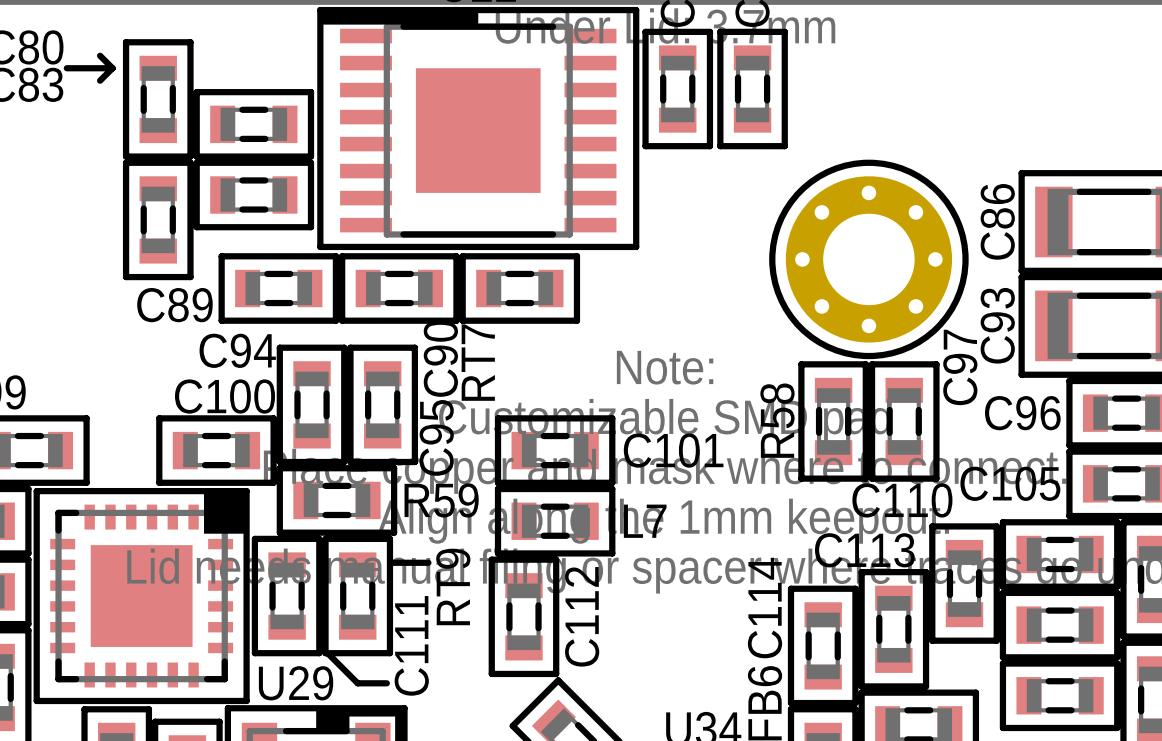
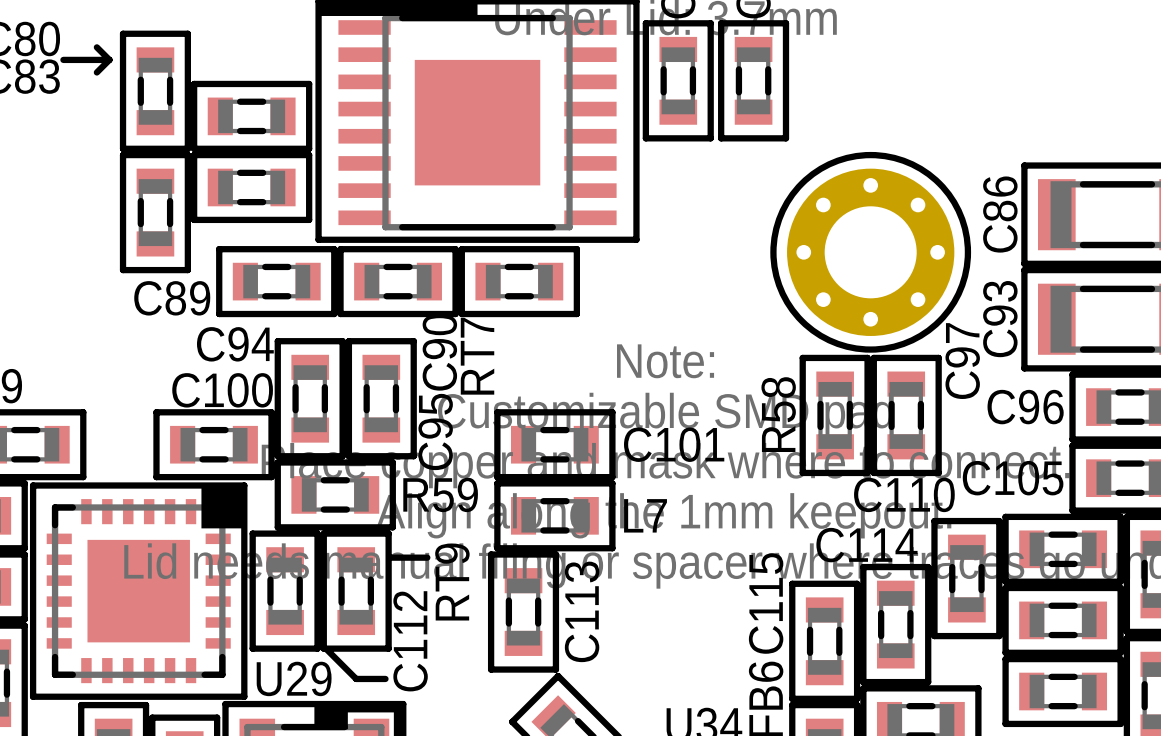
C113 name: C113 (864, 550) -> C114 (866, 545)
C114 name: C114 (765, 608) -> C115 (766, 603)
C112 name: C112 (582, 616) -> C113 (582, 611)
C111 name: C111 (411, 645) -> C112 (410, 641)

